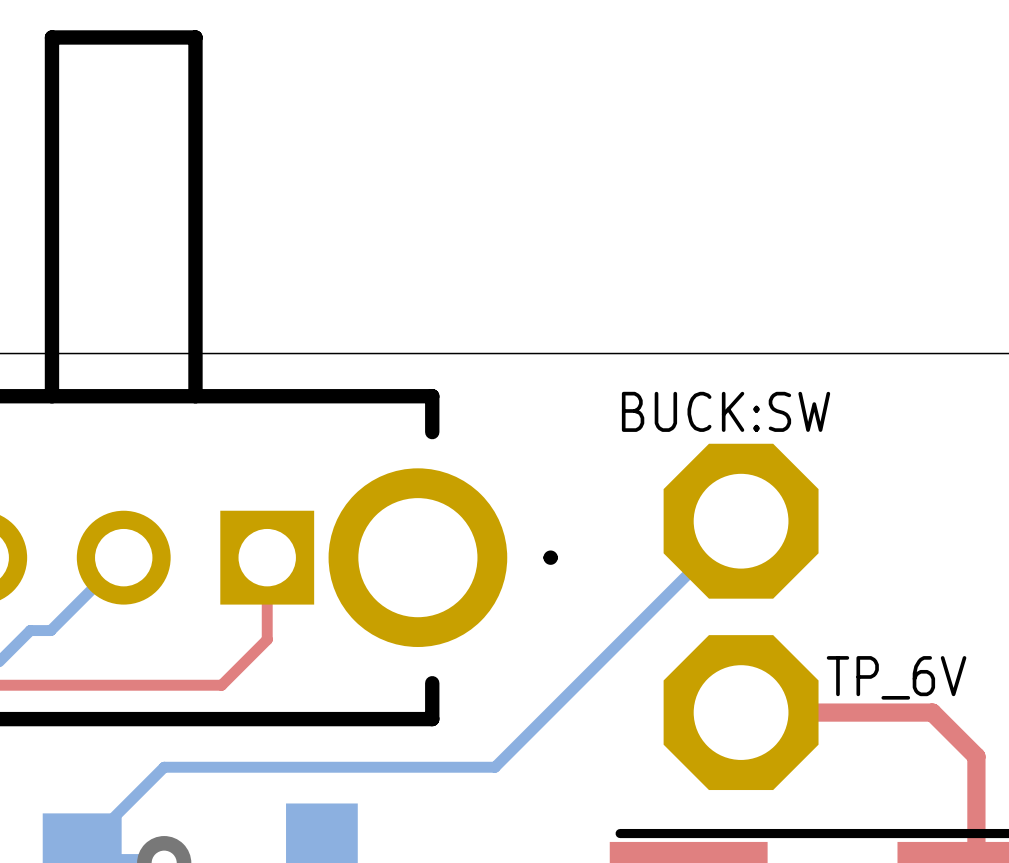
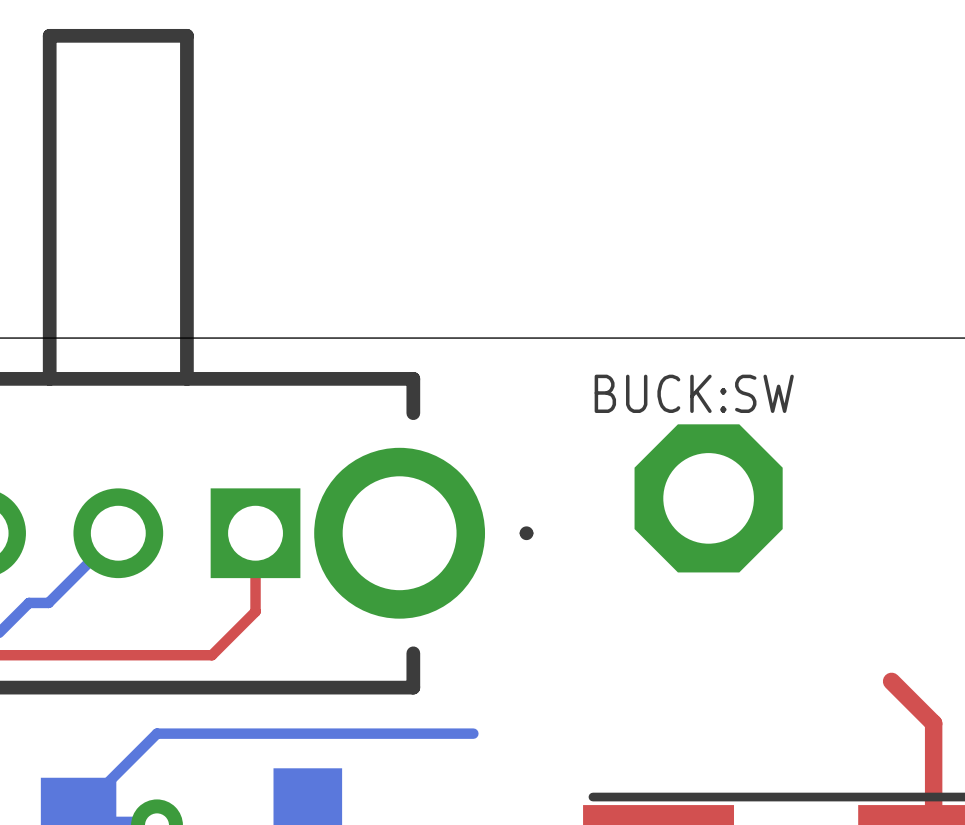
bottom track: (741, 521) (495, 767) -> none
top track: (741, 712) (932, 712) -> none
TP_6V: (741, 712) -> none

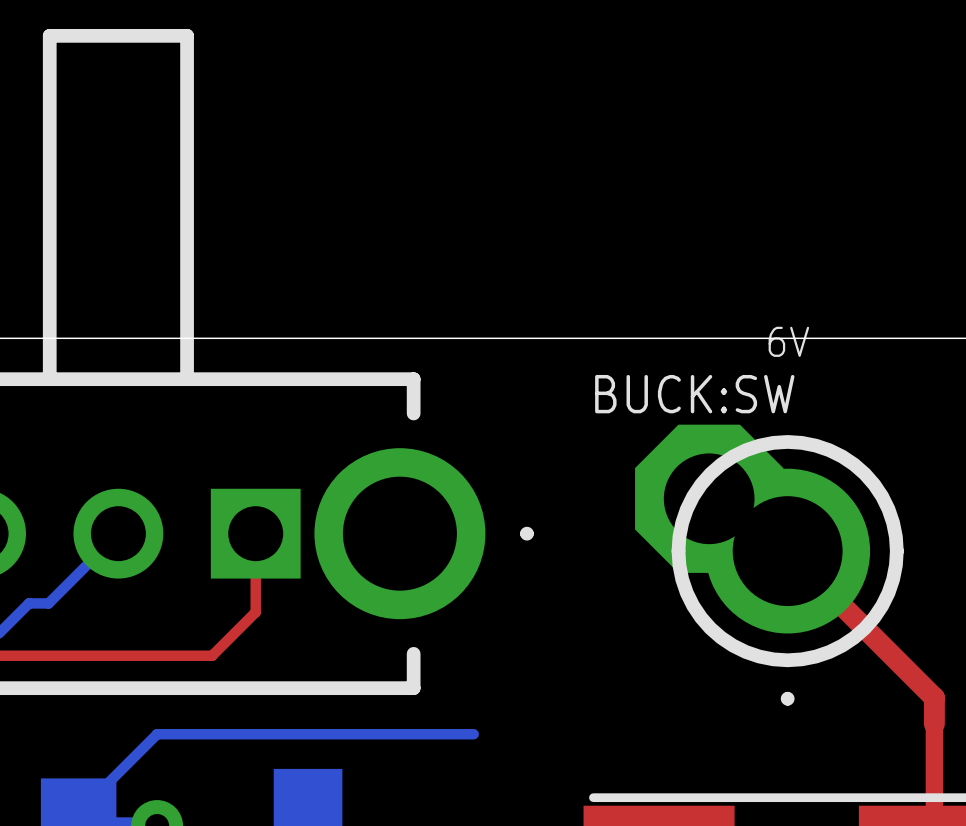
6V: none -> (787, 570)
top track: (891, 681) (933, 723) -> (787, 551) (934, 697) (934, 724)

